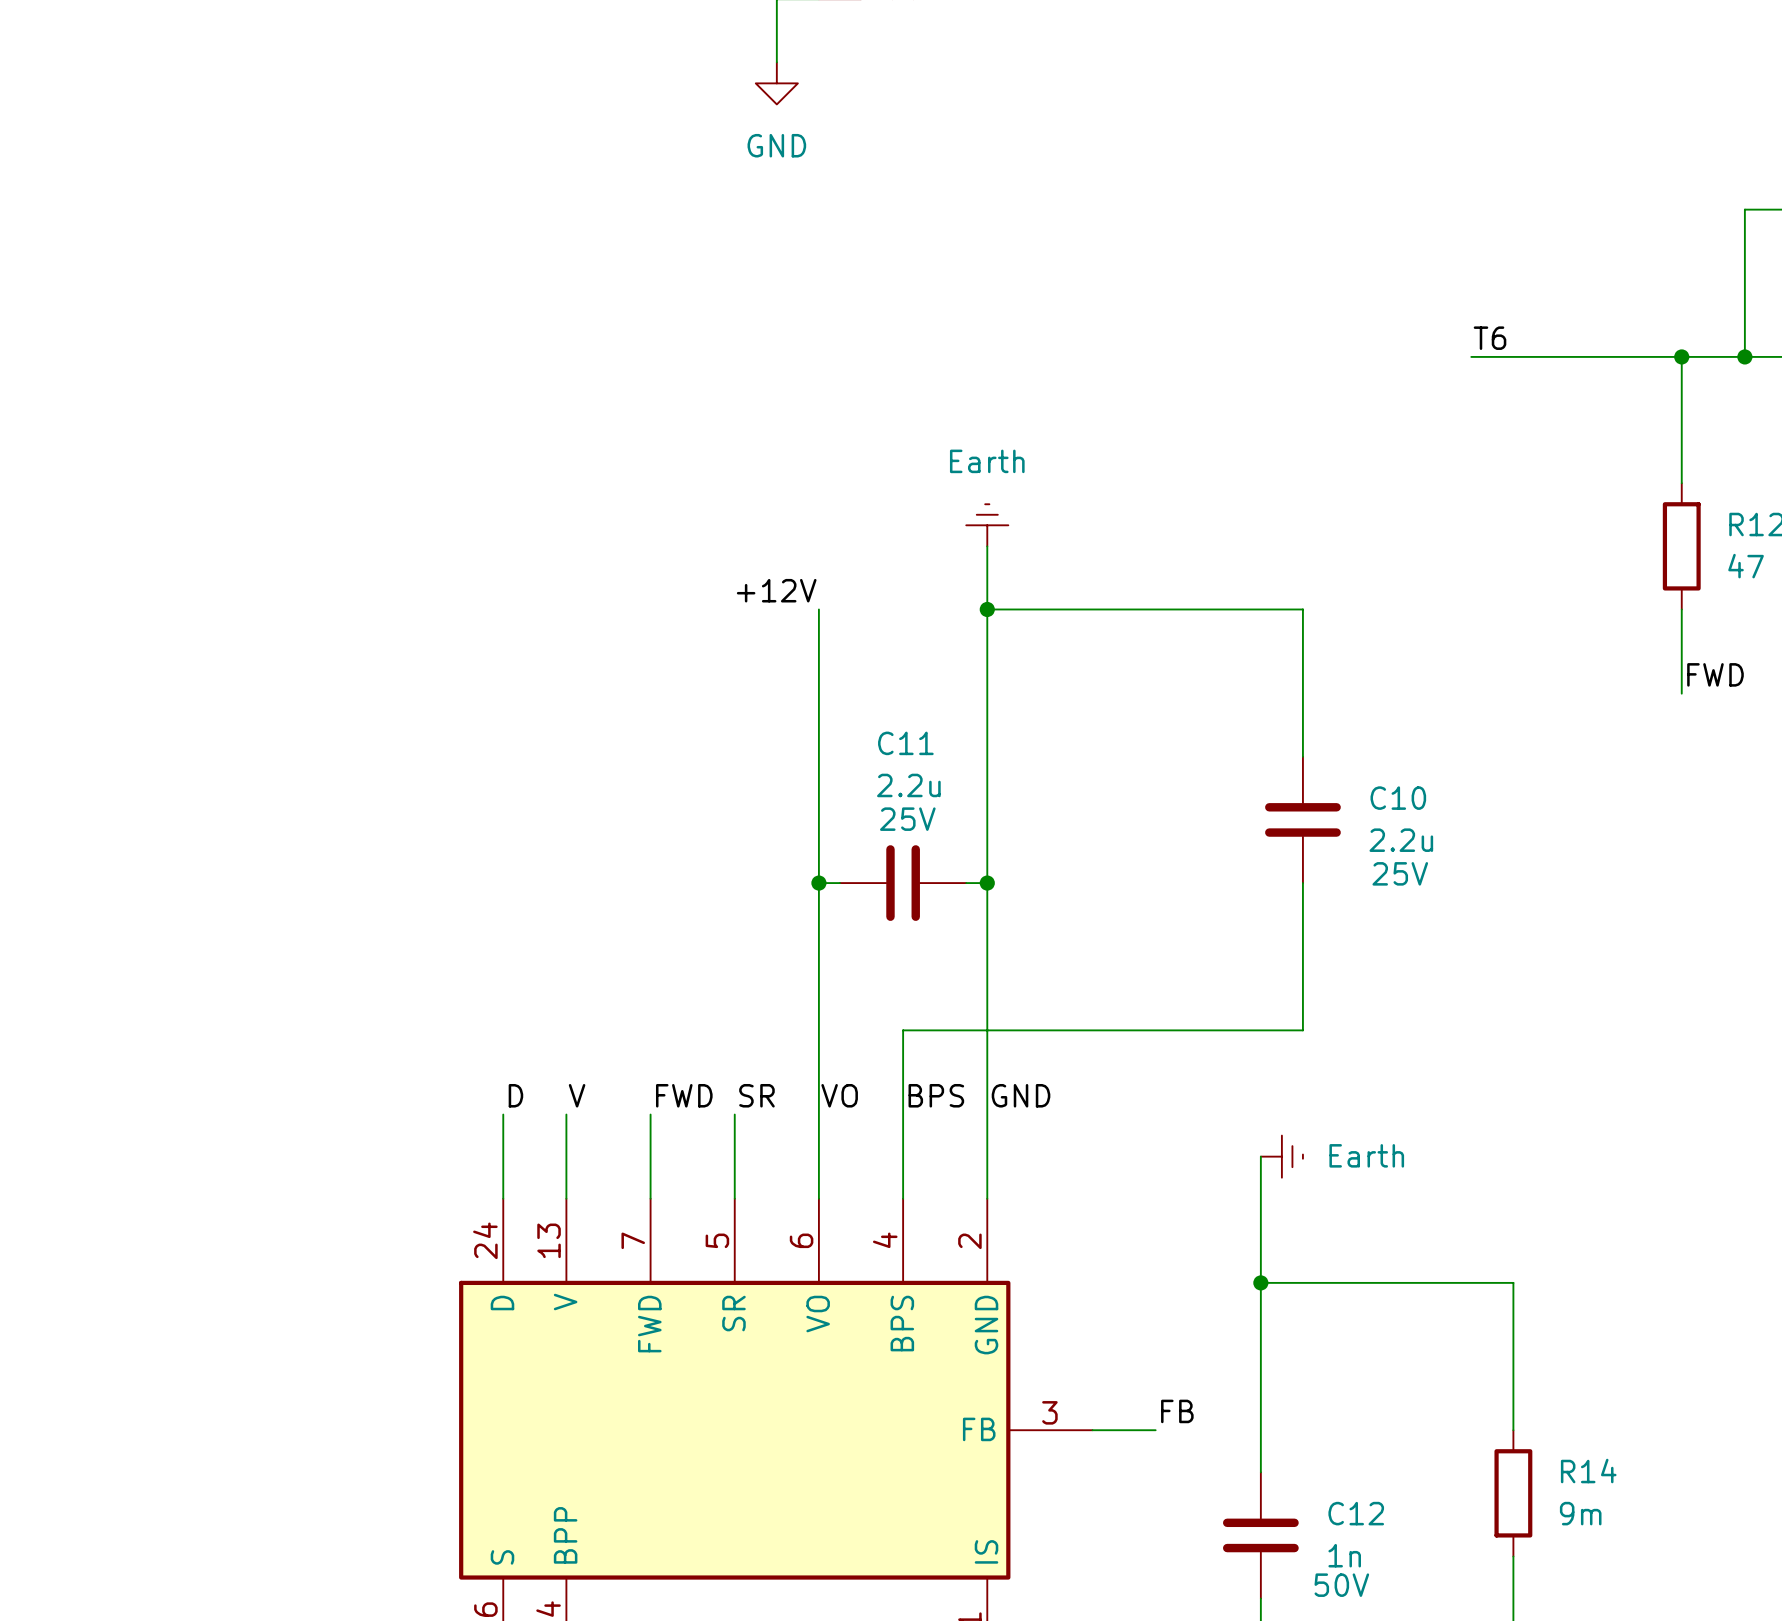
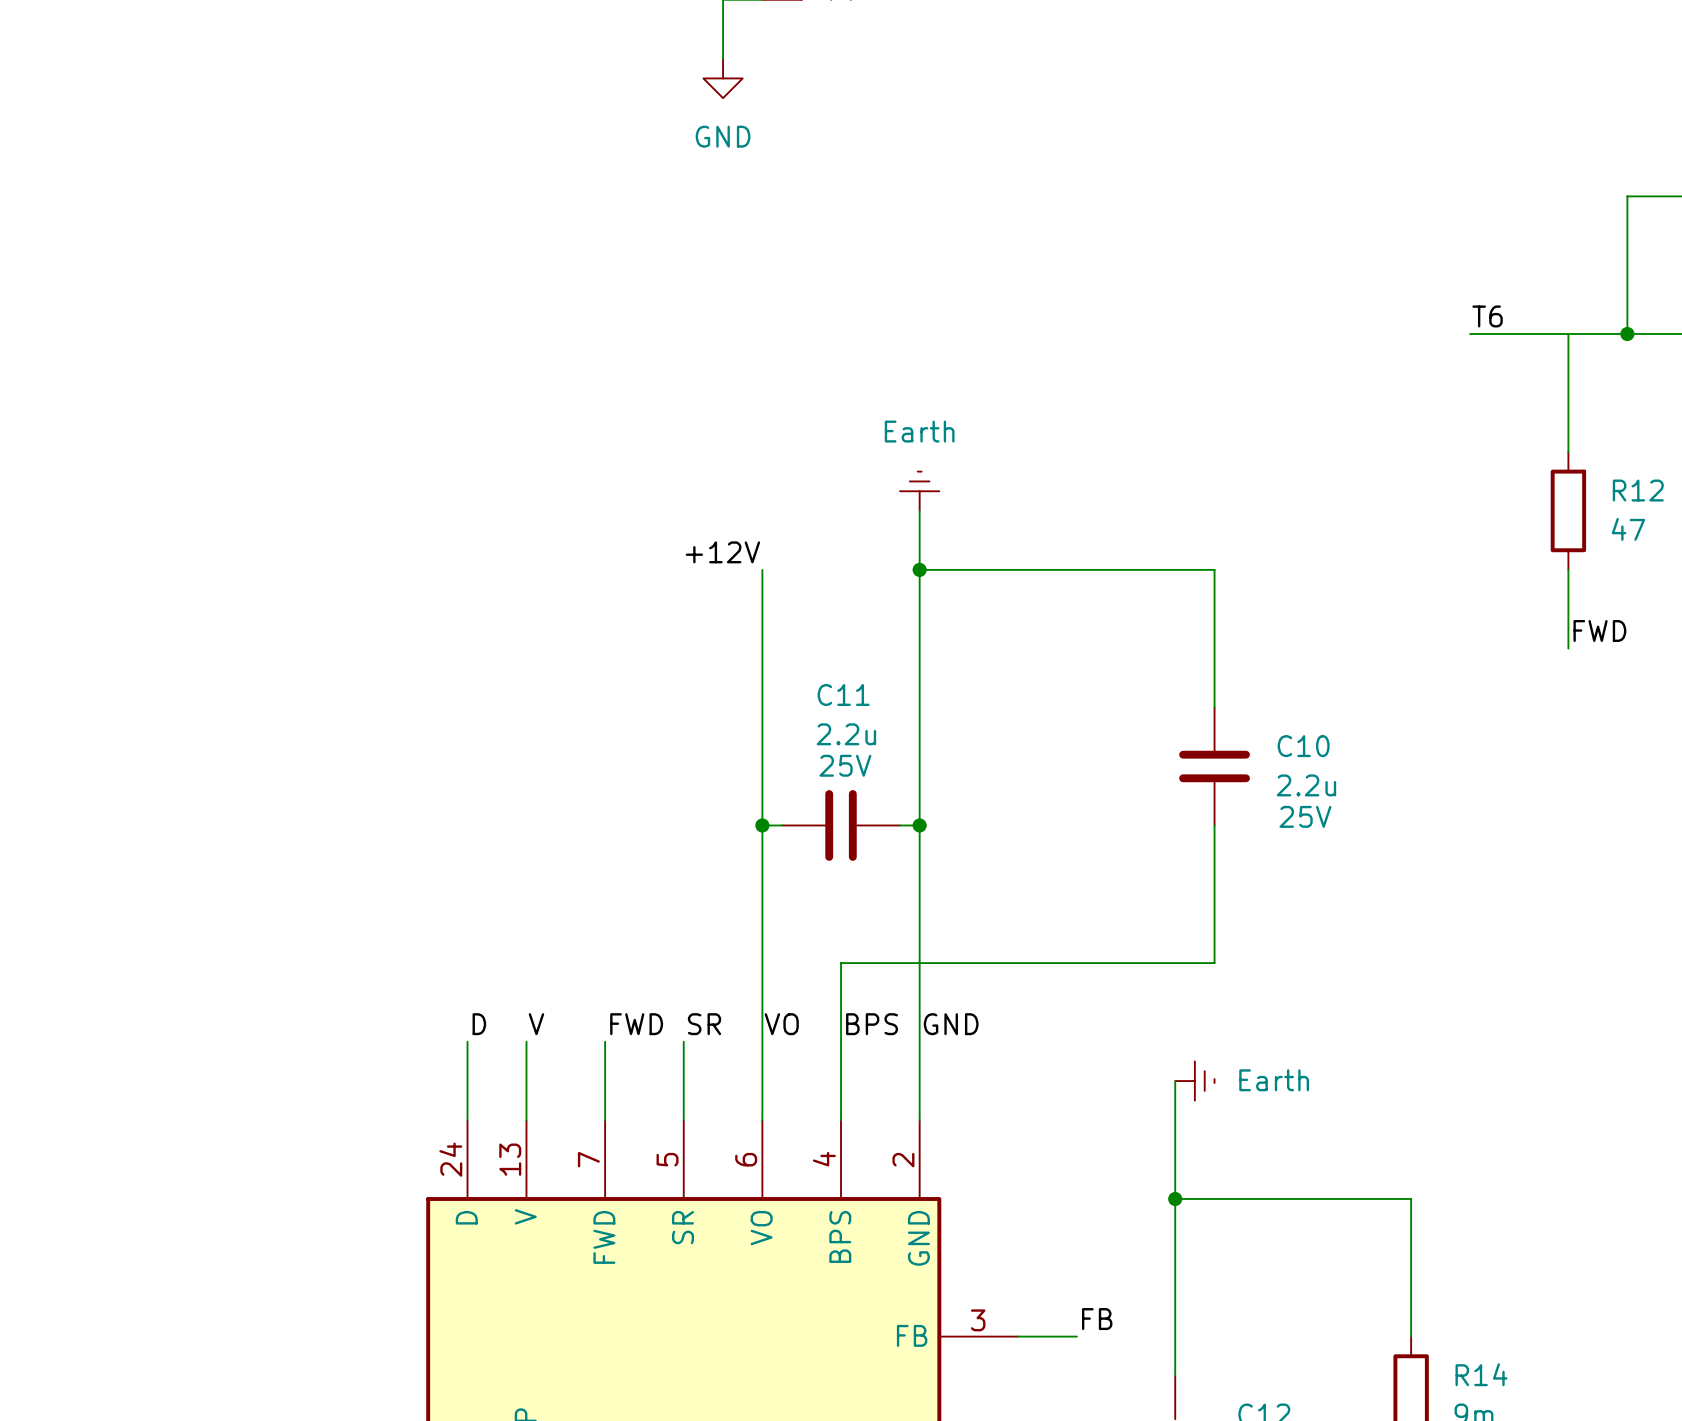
label position: T6 (1490, 338) -> T6 (1487, 316)
wire: (1471, 356) (1576, 356) -> none
junction: (1681, 356) -> none

